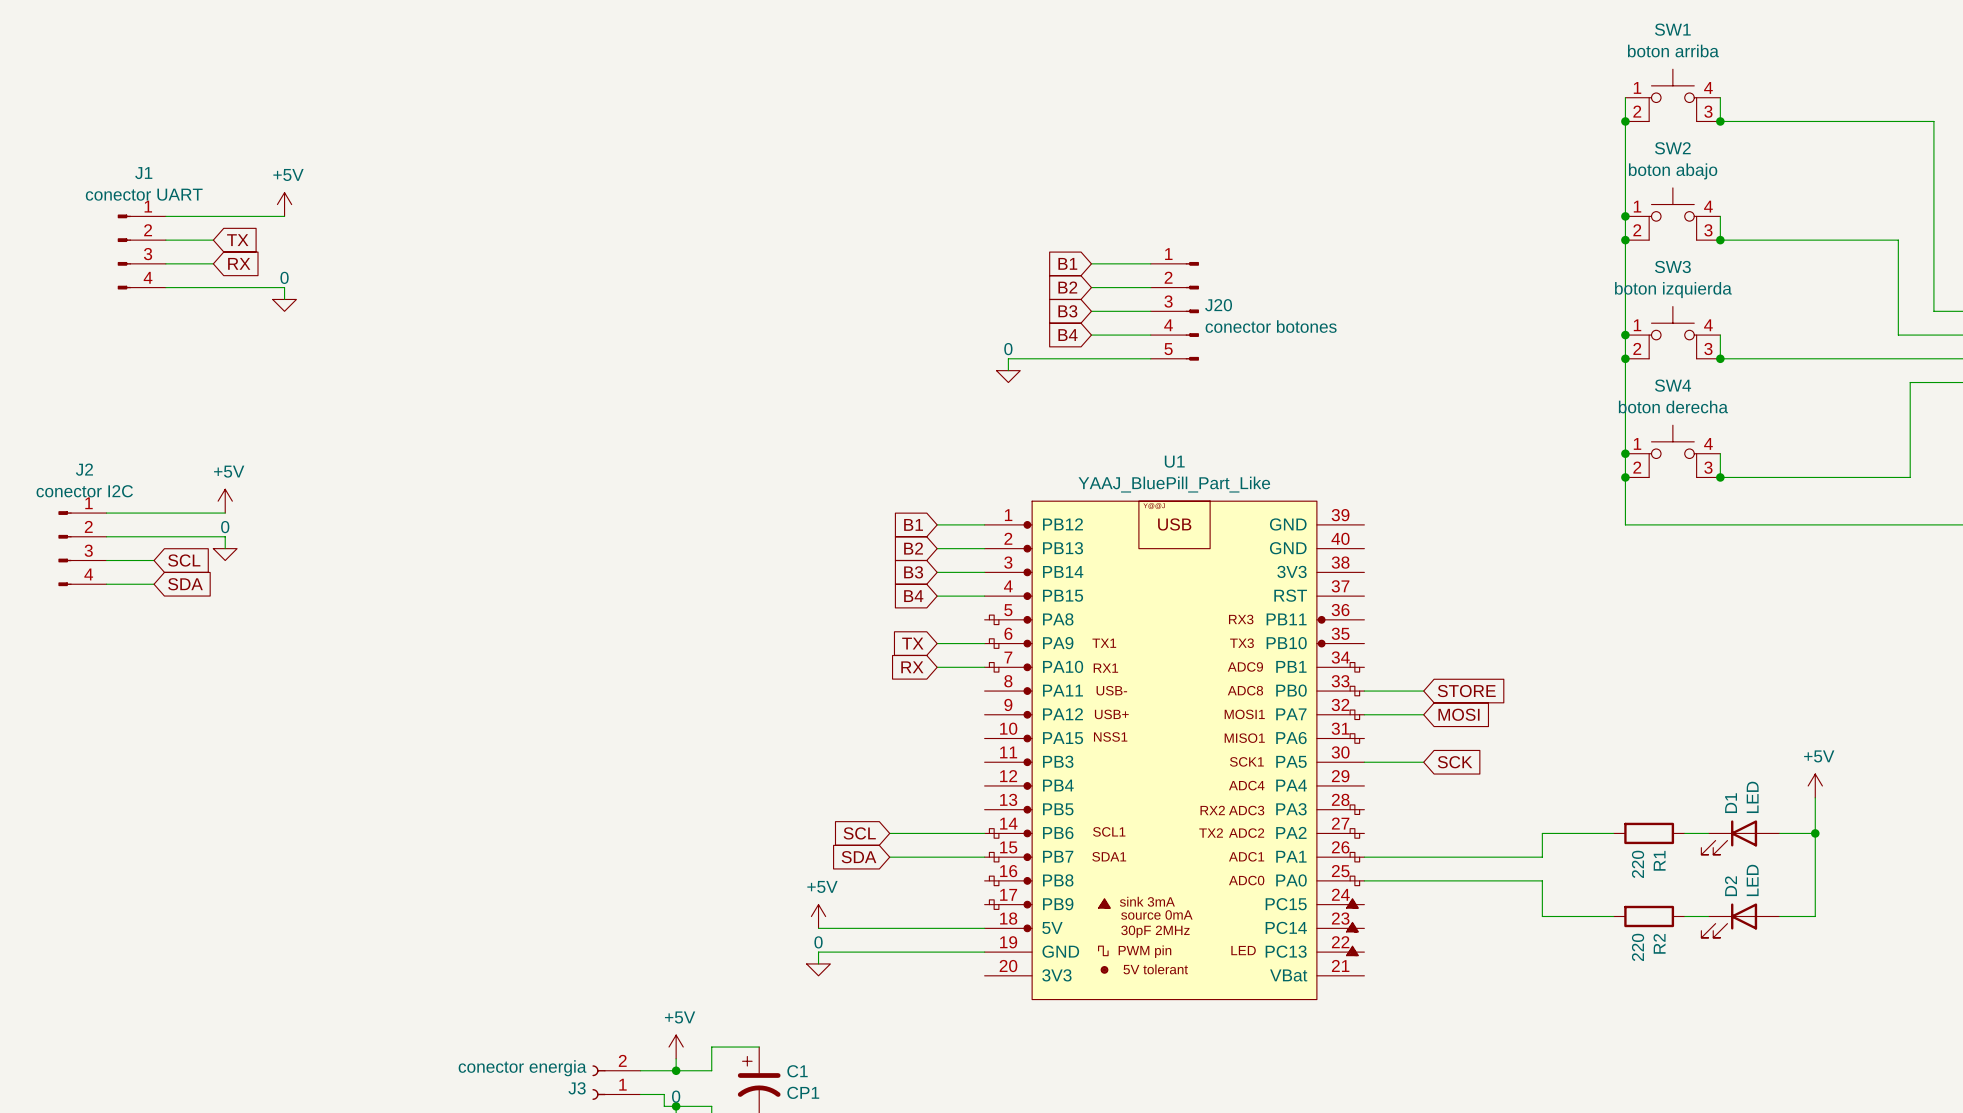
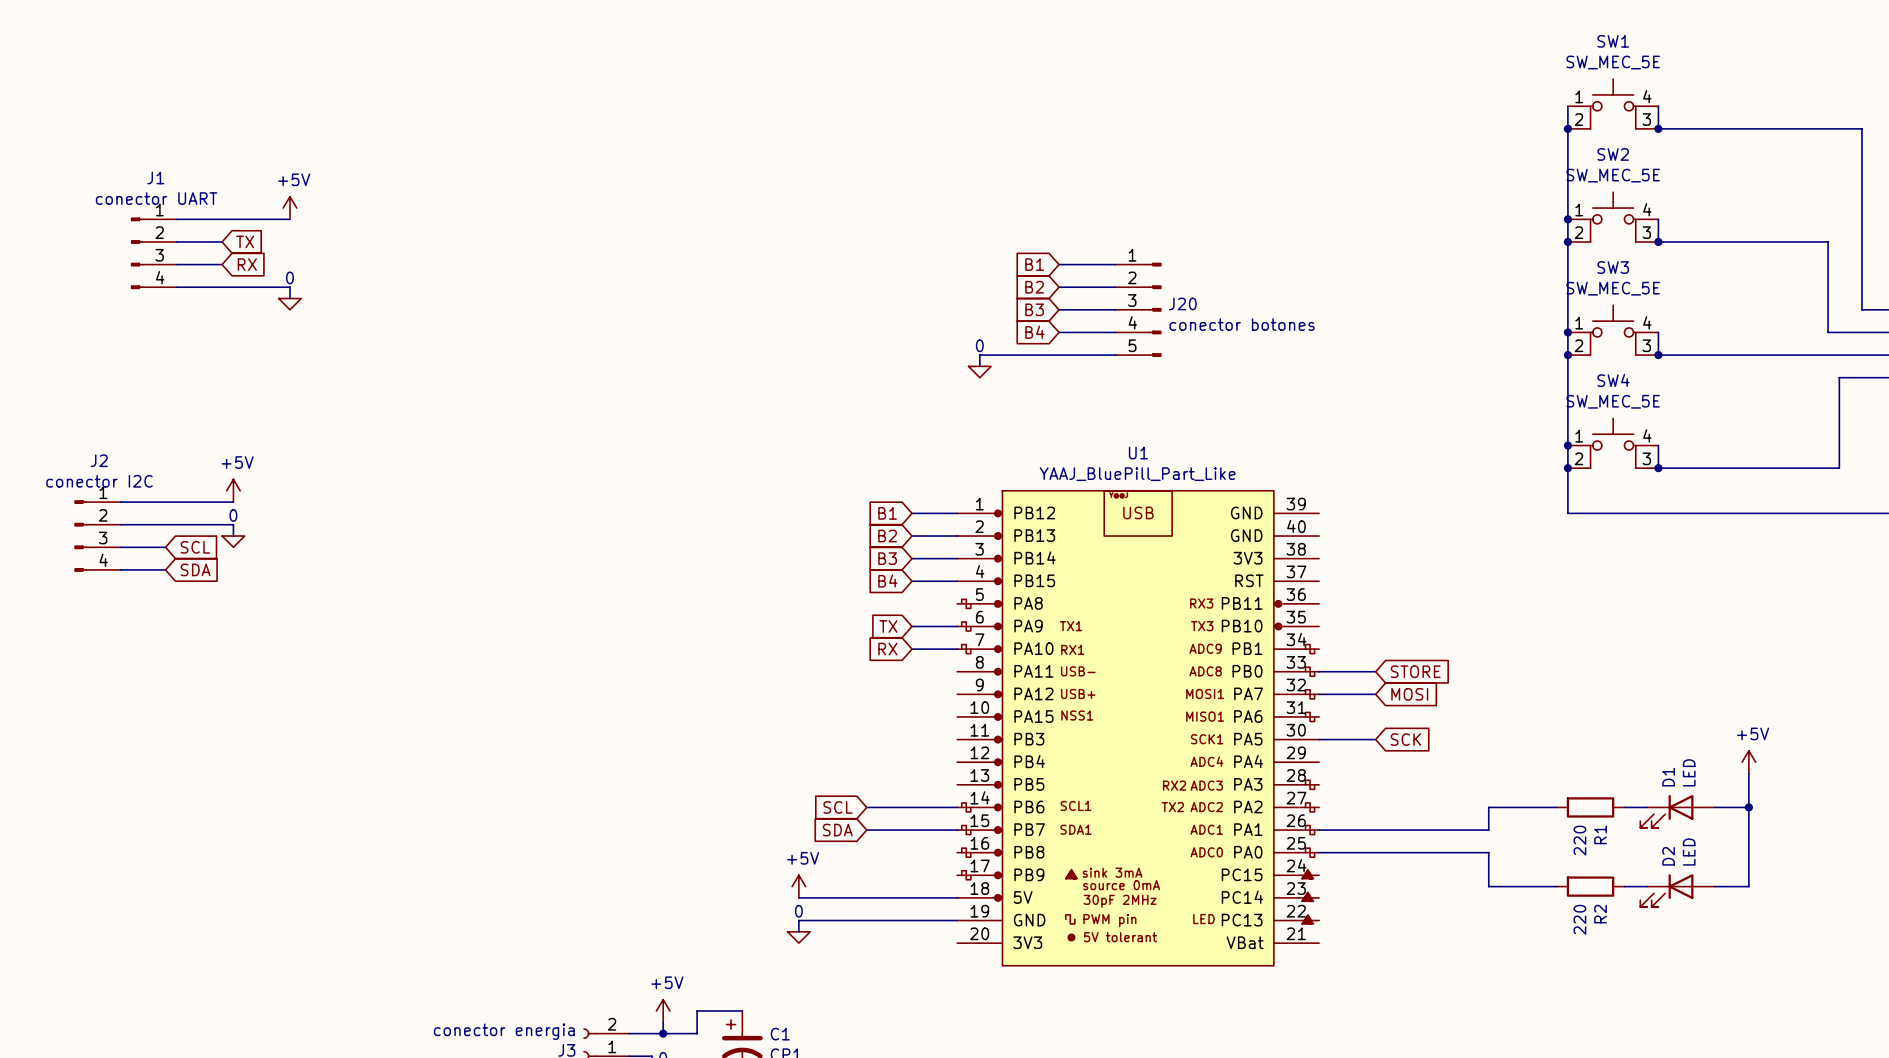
SW1 value: boton arriba (1673, 51) -> SW_MEC_5E (1613, 62)
SW2 value: boton abajo (1673, 171) -> SW_MEC_5E (1613, 175)
SW3 value: boton izquierda (1673, 290) -> SW_MEC_5E (1613, 288)
SW4 value: boton derecha (1673, 407) -> SW_MEC_5E (1613, 401)

